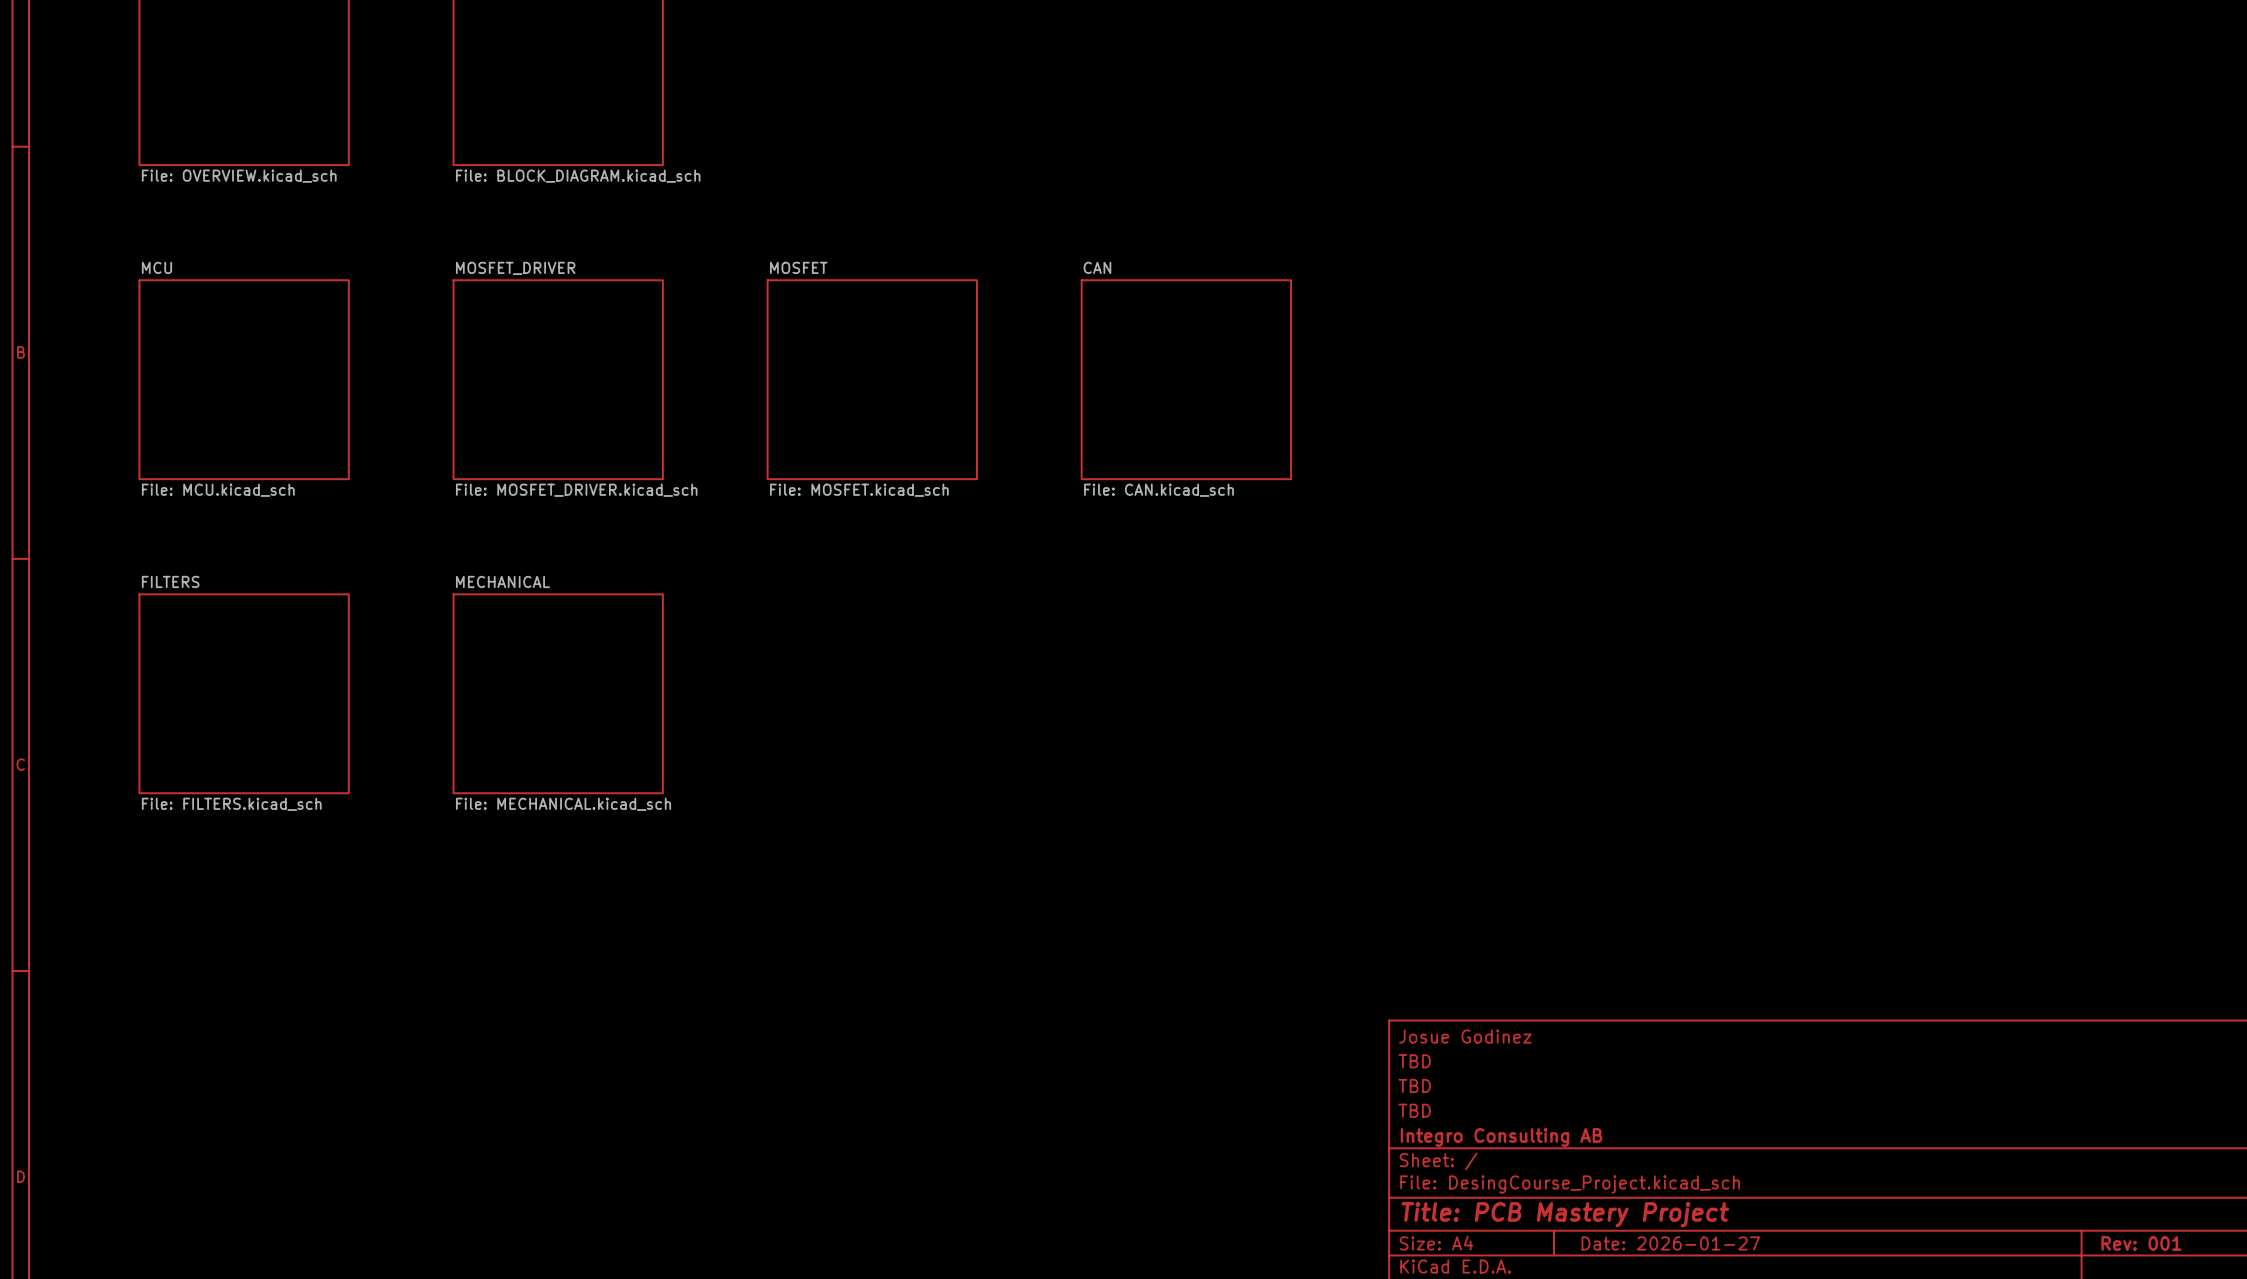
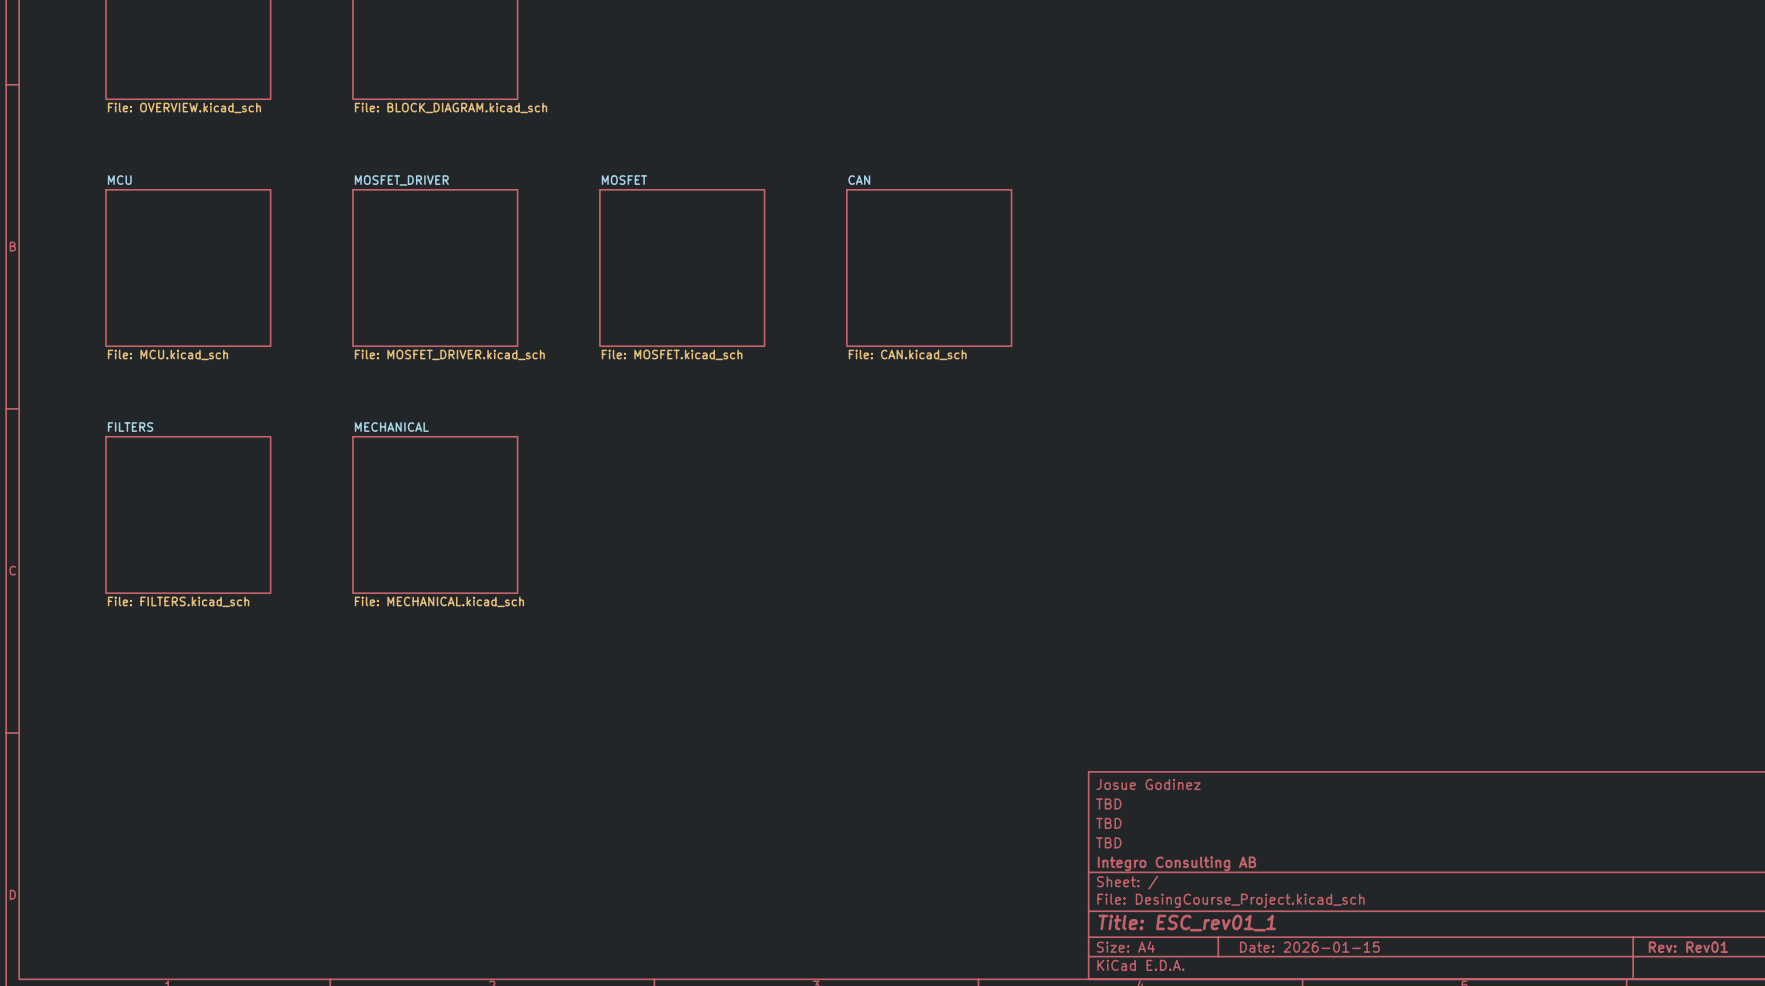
title block: Title: PCB Mastery Project (1565, 1214) -> Title: ESC_rev01_1 (1187, 923)
title block: Date: 2026-01-27 (1670, 1243) -> Date: 2026-01-15 (1309, 947)
title block: Rev: 001 (2141, 1243) -> Rev: Rev01 (1688, 947)

